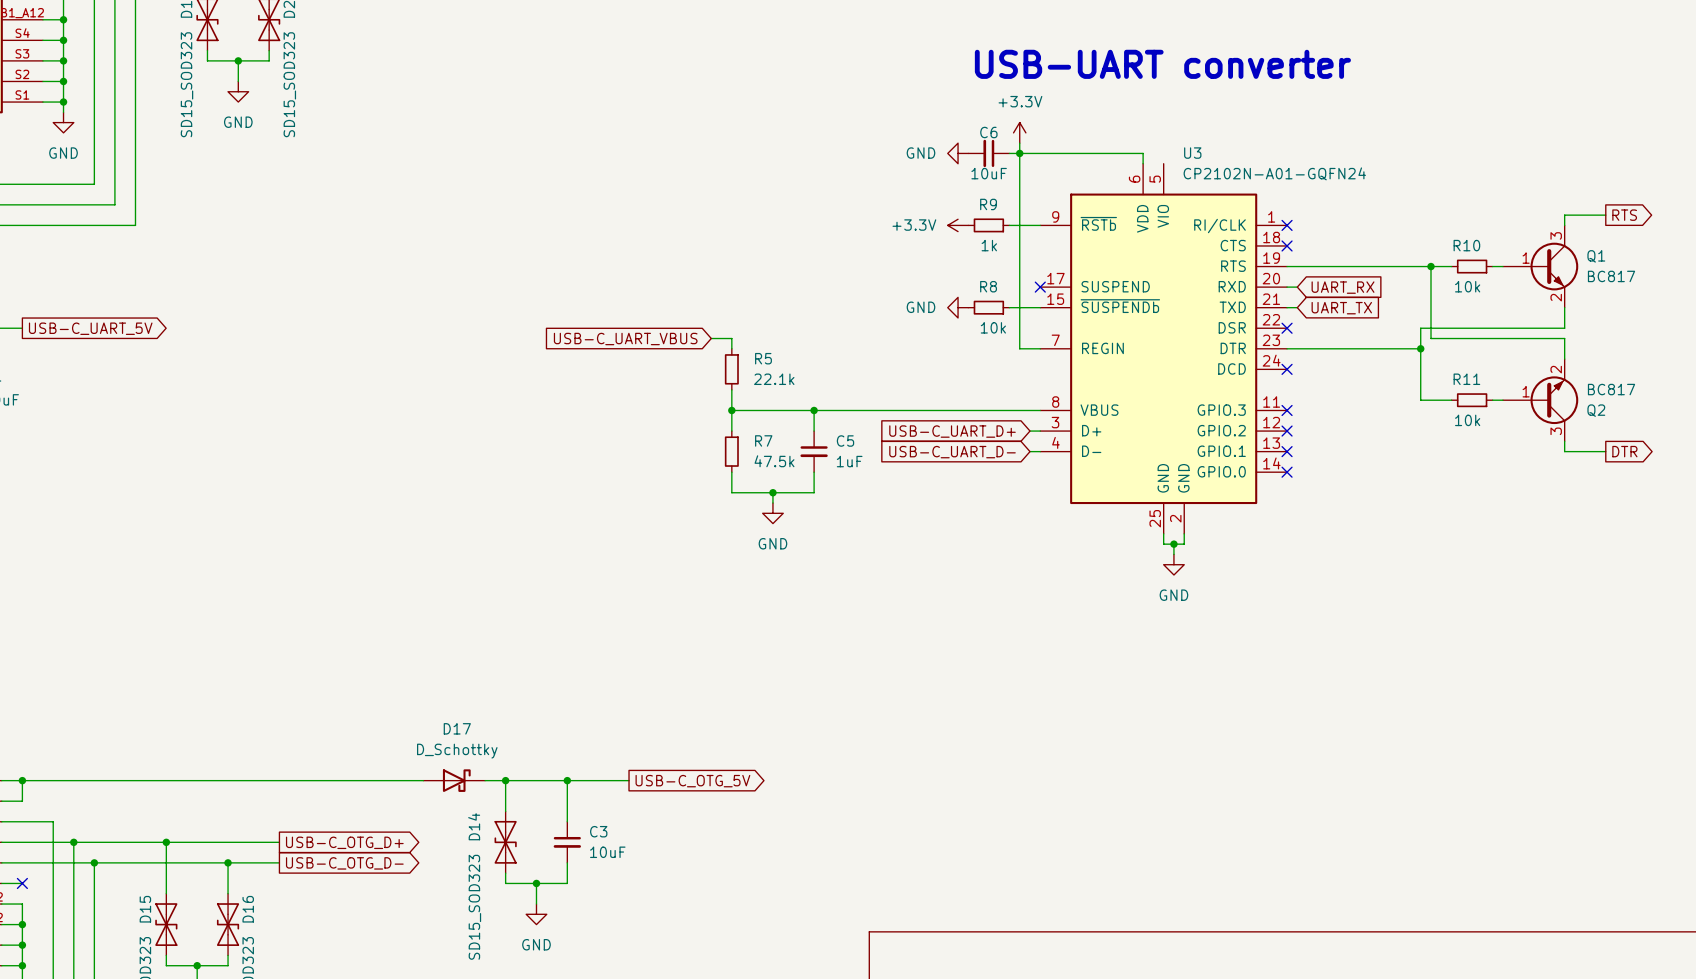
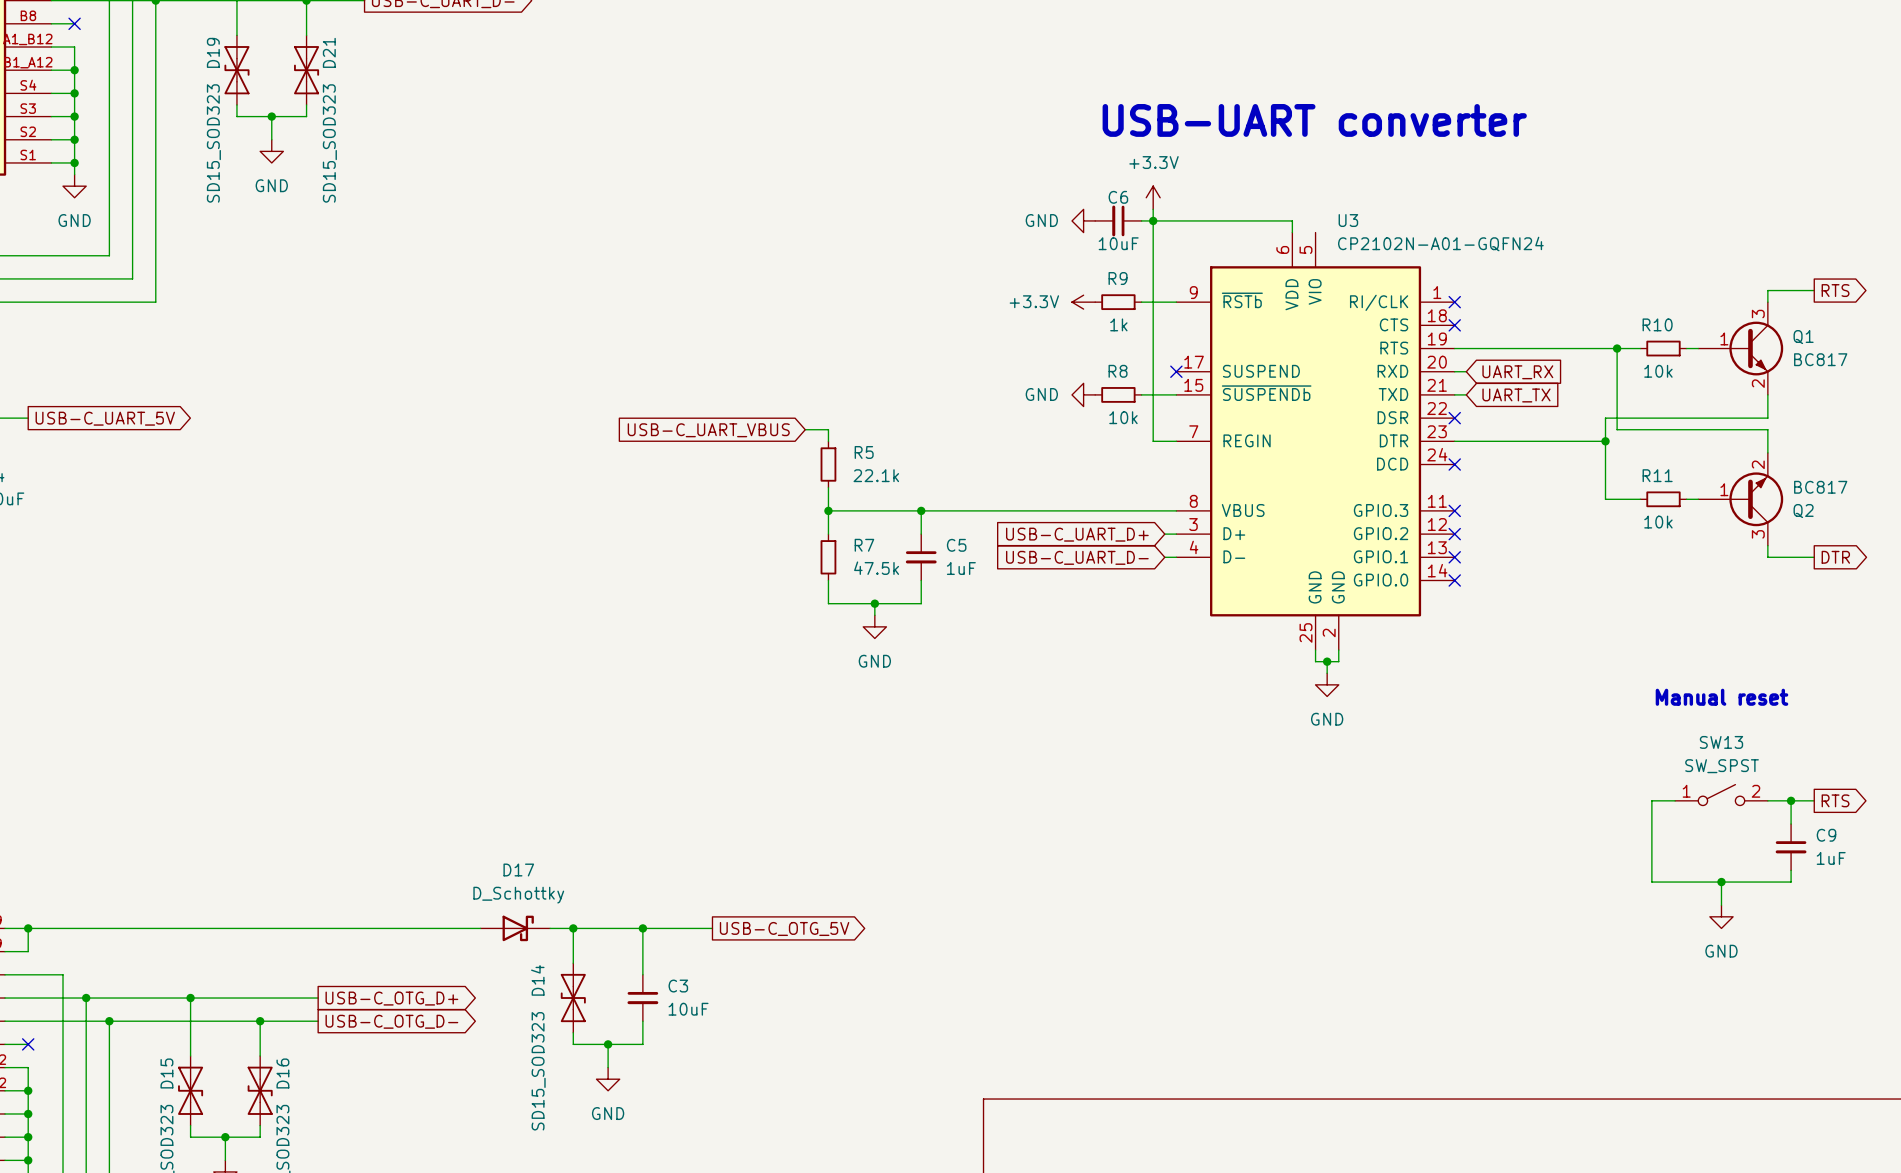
text: none -> Manual reset (1721, 697)
SW13: none -> SW_SPST (1721, 795)
wire: none -> (1675, 800) (1651, 800) (1651, 882) (1791, 882) (1791, 870)
wire: none -> (1767, 800) (1814, 800)
wire: none -> (1791, 800) (1791, 824)
junction: none -> (1791, 800)
global label: none -> RTS (1835, 800)
C9: none -> 1uF (1791, 847)
wire: none -> (1721, 882) (1721, 905)
junction: none -> (1721, 882)
power symbol: none -> GND (1721, 916)

